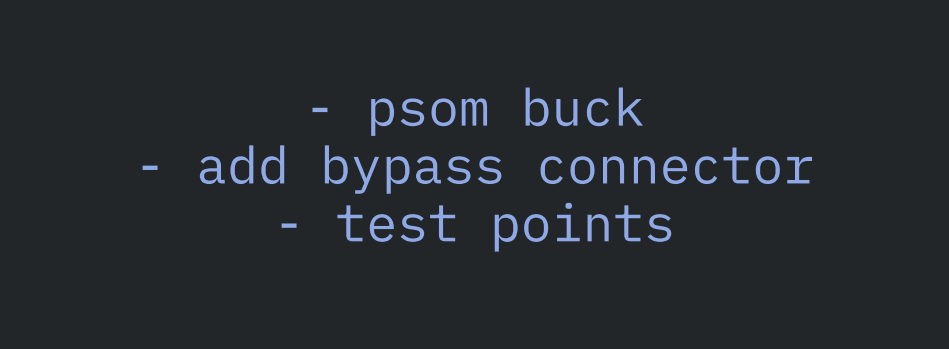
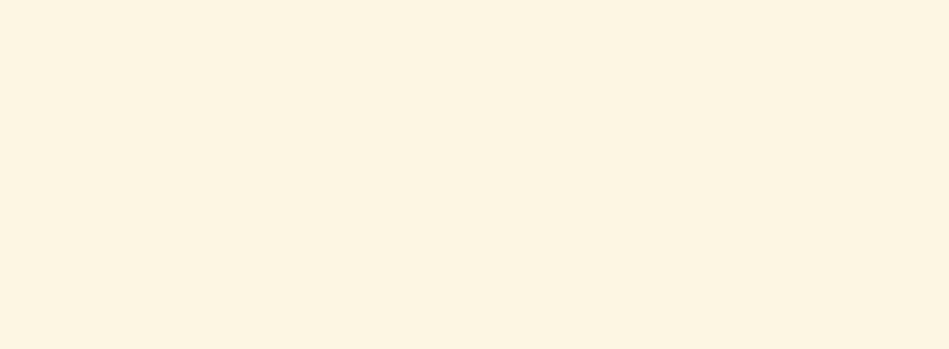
text: - psom buck (477, 111) -> none
text: - add bypass connector (477, 169) -> none
text: - test points (476, 227) -> none

